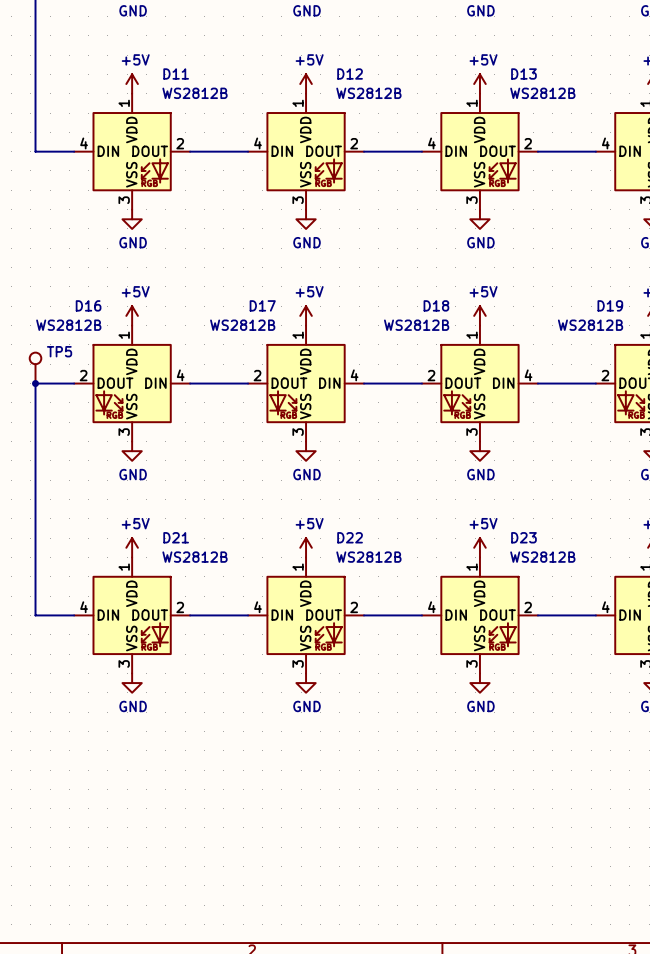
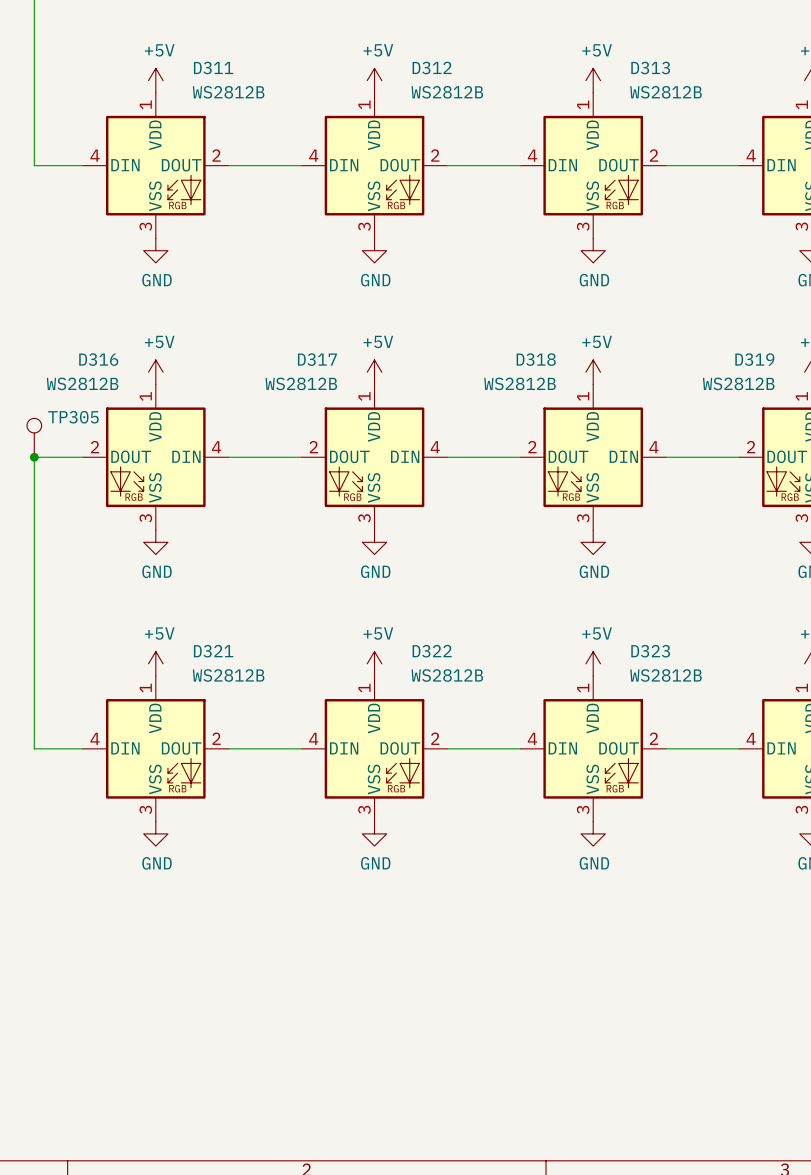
D11 name: D11 (176, 73) -> D311 (213, 68)
D12 name: D12 (350, 73) -> D312 (432, 68)
D13 name: D13 (523, 73) -> D313 (650, 68)
D16 name: D16 (88, 305) -> D316 (98, 359)
D17 name: D17 (262, 305) -> D317 (317, 359)
D18 name: D18 (436, 305) -> D318 (536, 359)
D19 name: D19 (610, 305) -> D319 (754, 359)
TP5 name: TP5 (59, 351) -> TP305 (73, 417)
D21 name: D21 (176, 537) -> D321 (213, 651)
D22 name: D22 (350, 537) -> D322 (432, 651)
D23 name: D23 (523, 537) -> D323 (650, 651)

